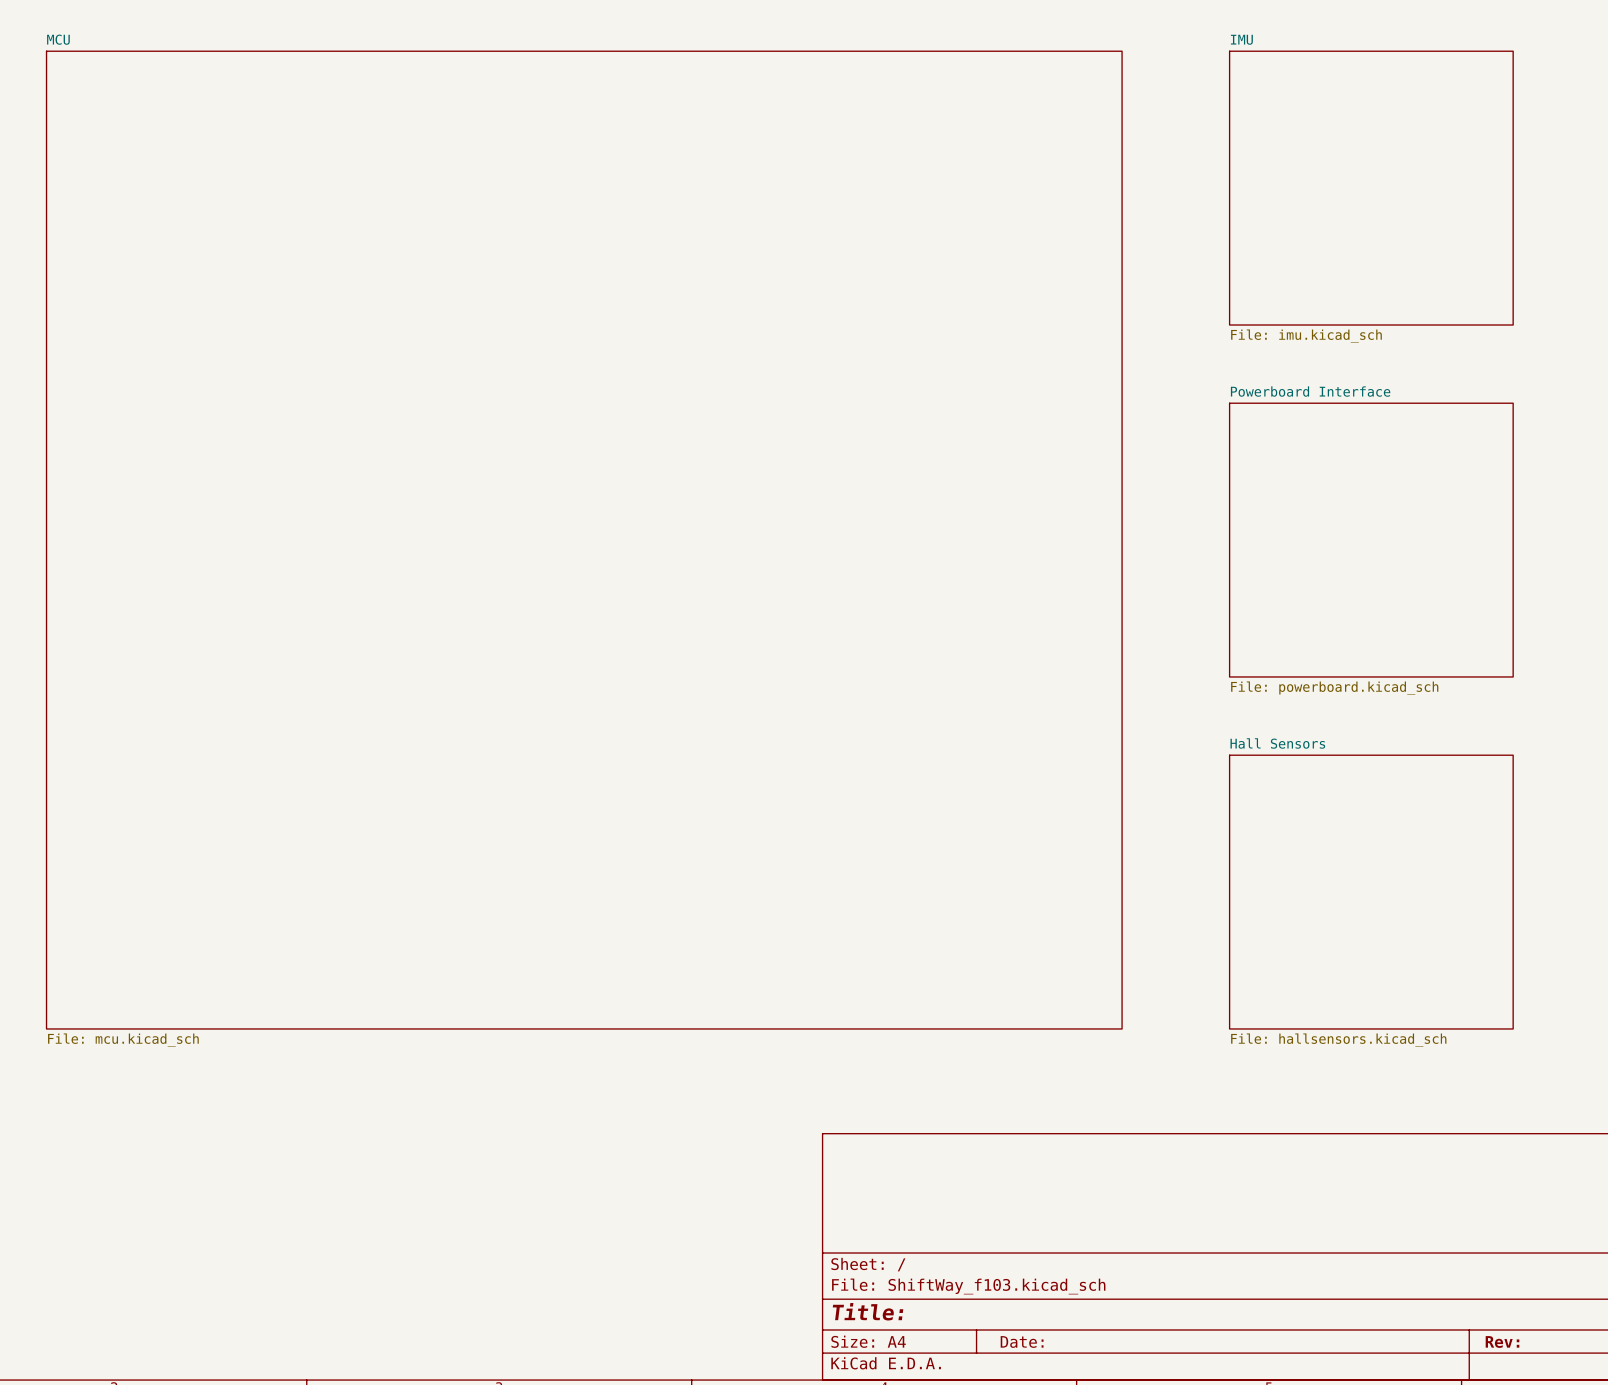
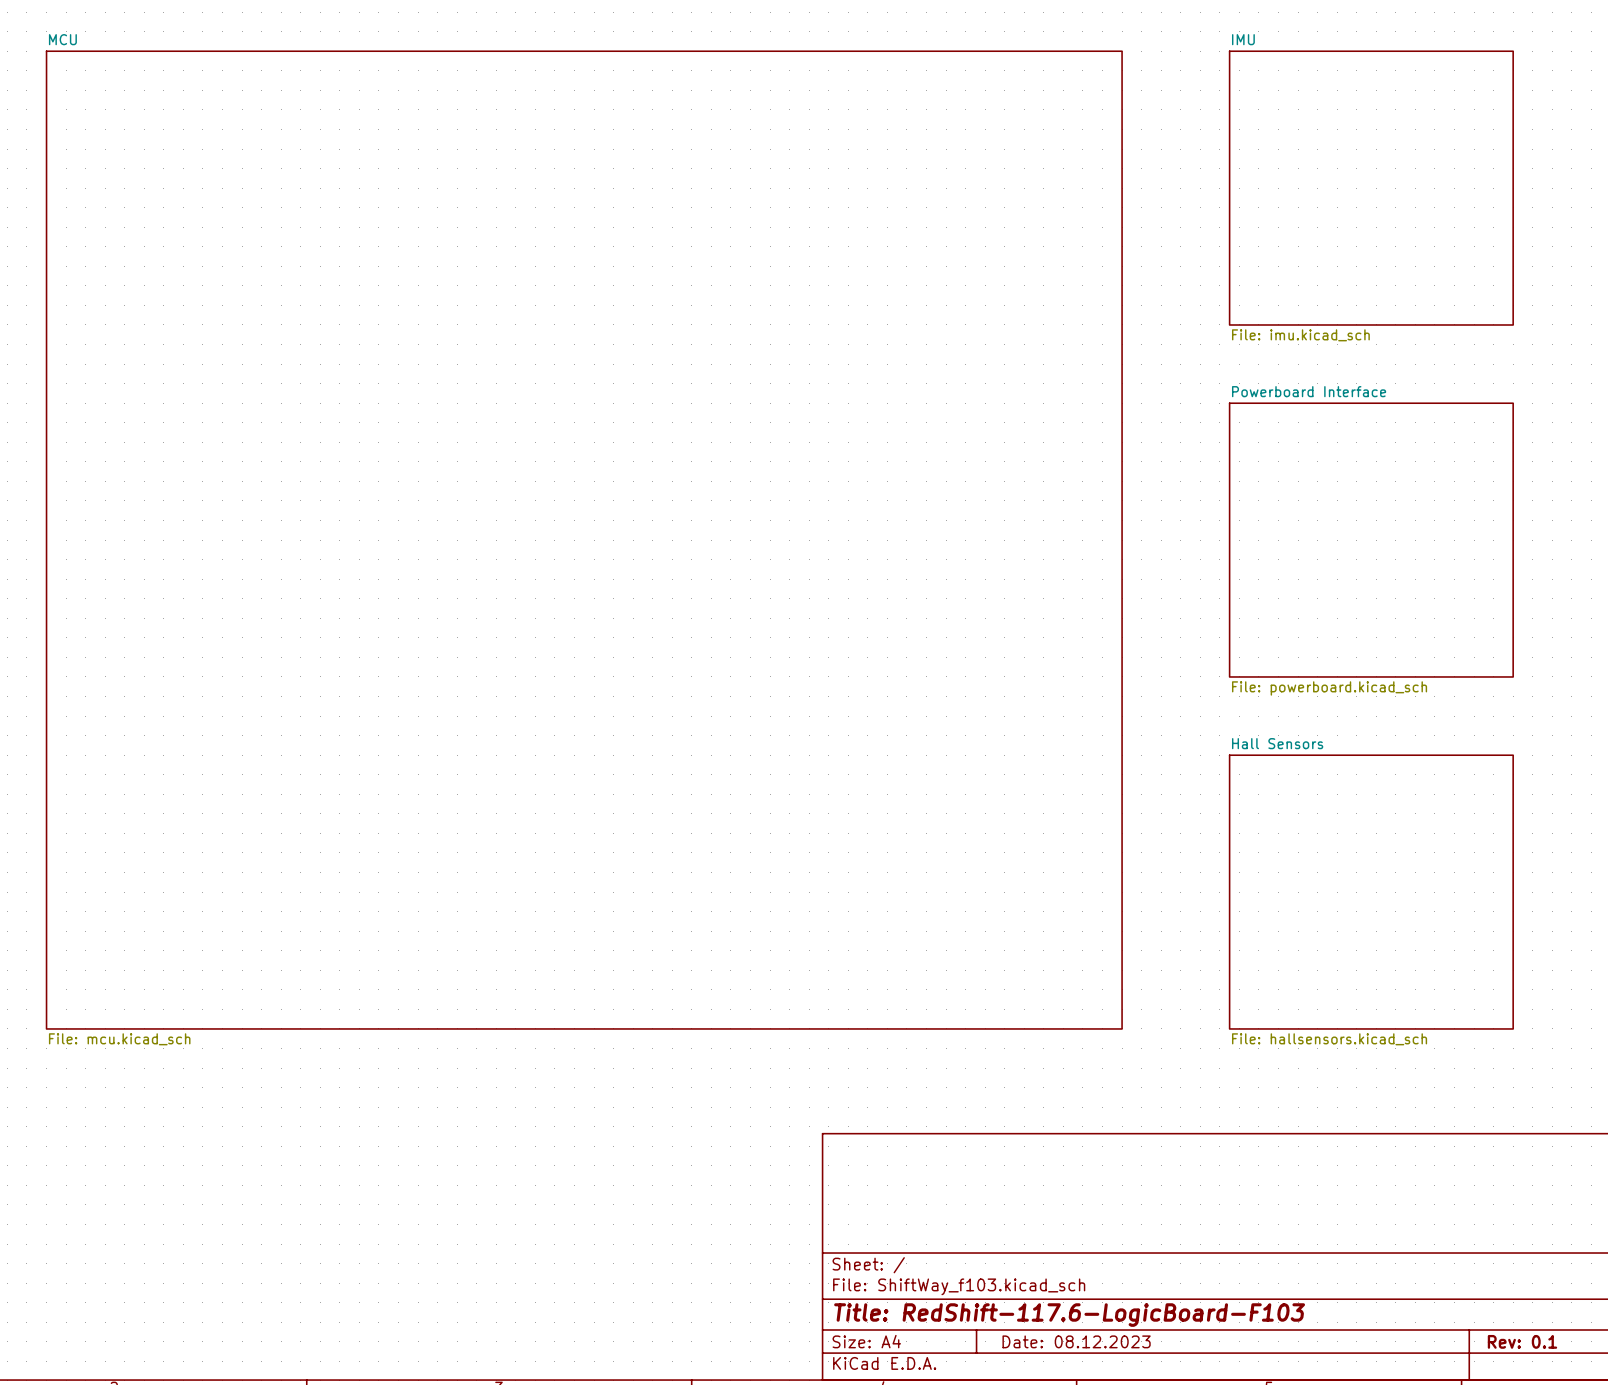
title block: Title: (868, 1311) -> Title: RedShift-117.6-LogicBoard-F103 (1069, 1315)
title block: Date: (1022, 1341) -> Date: 08.12.2023 (1076, 1341)
title block: Rev: (1502, 1341) -> Rev: 0.1 (1522, 1341)

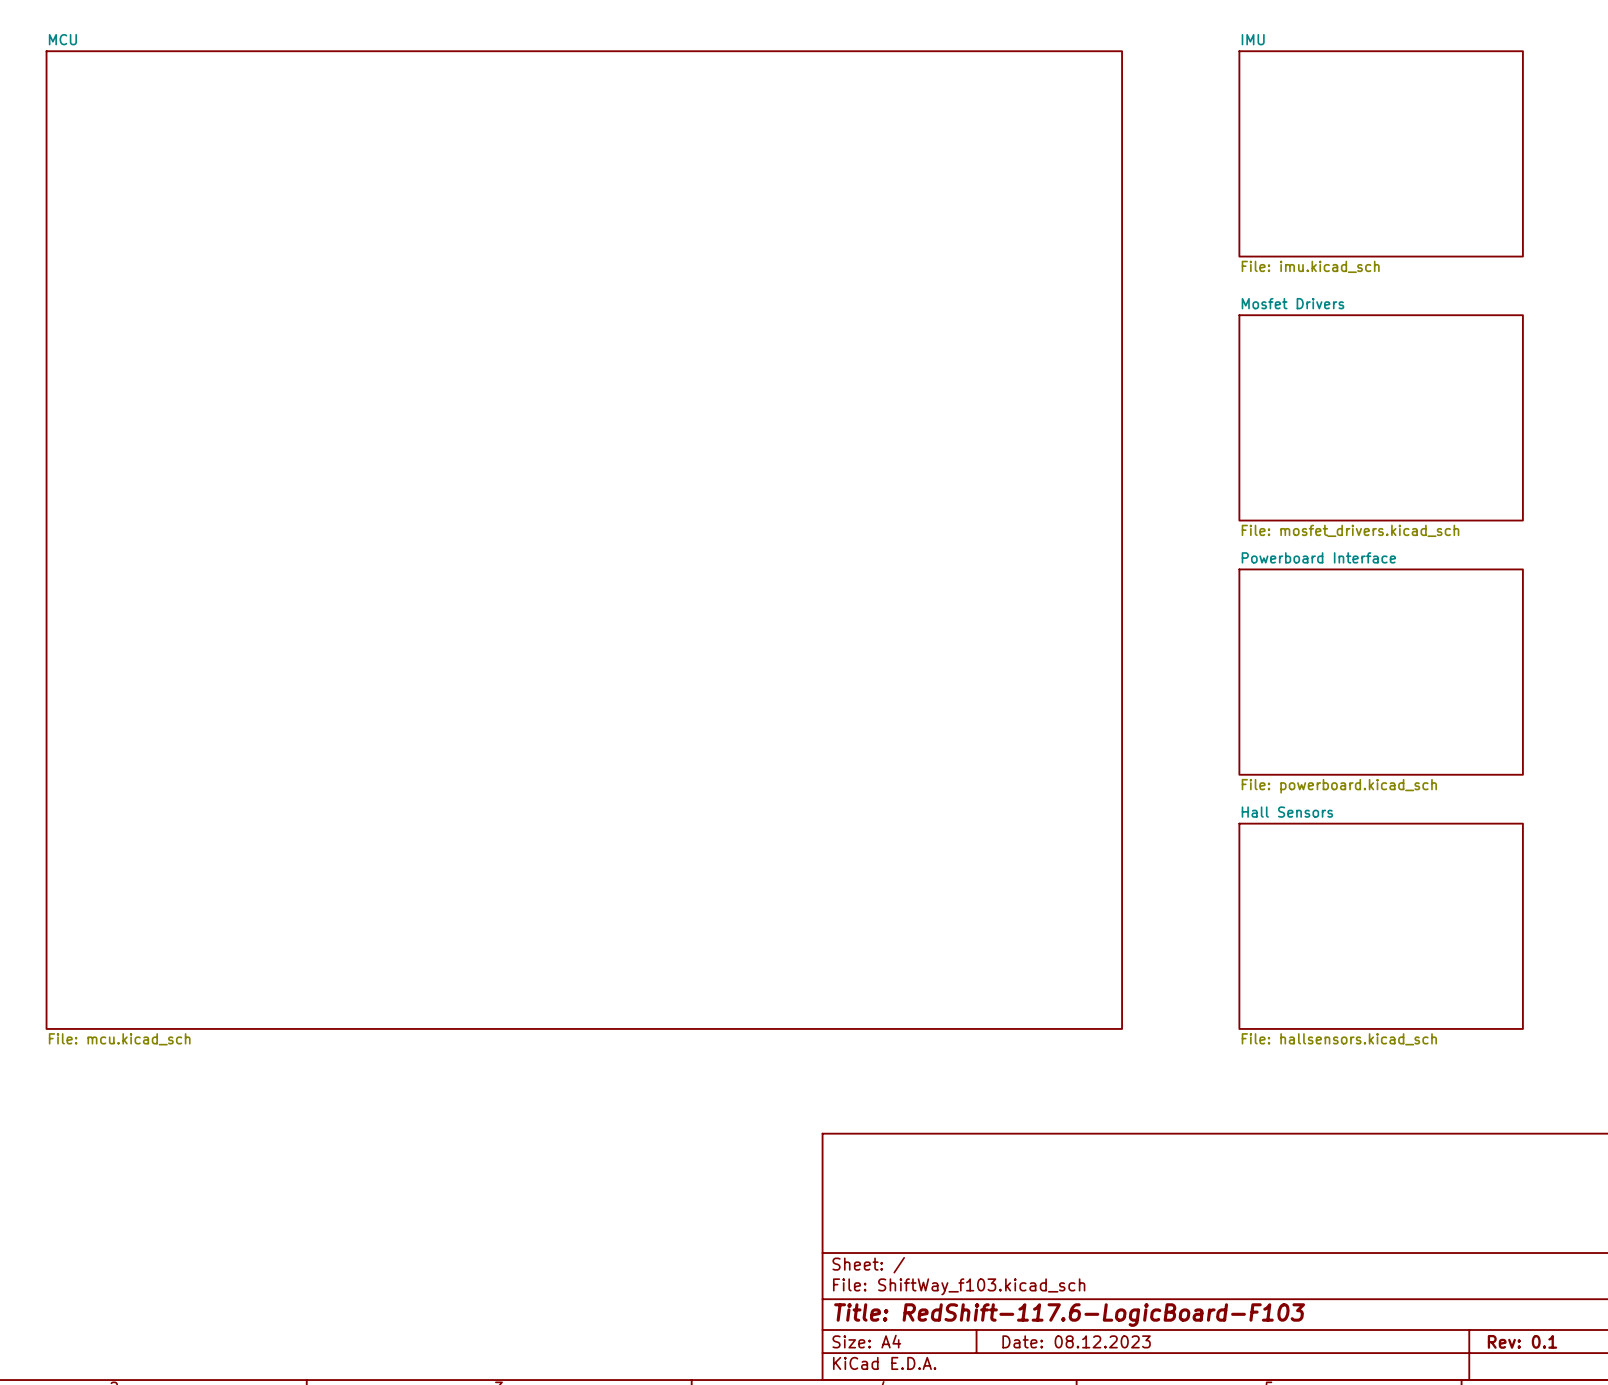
sheet IMU: none -> File: imu.kicad_sch (1381, 153)
sheet IMU: File: imu.kicad_sch (1371, 188) -> none
sheet Mosfet Drivers: none -> File: mosfet_drivers.kicad_sch (1381, 417)
sheet Powerboard Interface: File: powerboard.kicad_sch (1371, 540) -> none
sheet Powerboard Interface: none -> File: powerboard.kicad_sch (1381, 672)
sheet Hall Sensors: File: hallsensors.kicad_sch (1371, 892) -> none
sheet Hall Sensors: none -> File: hallsensors.kicad_sch (1381, 926)

